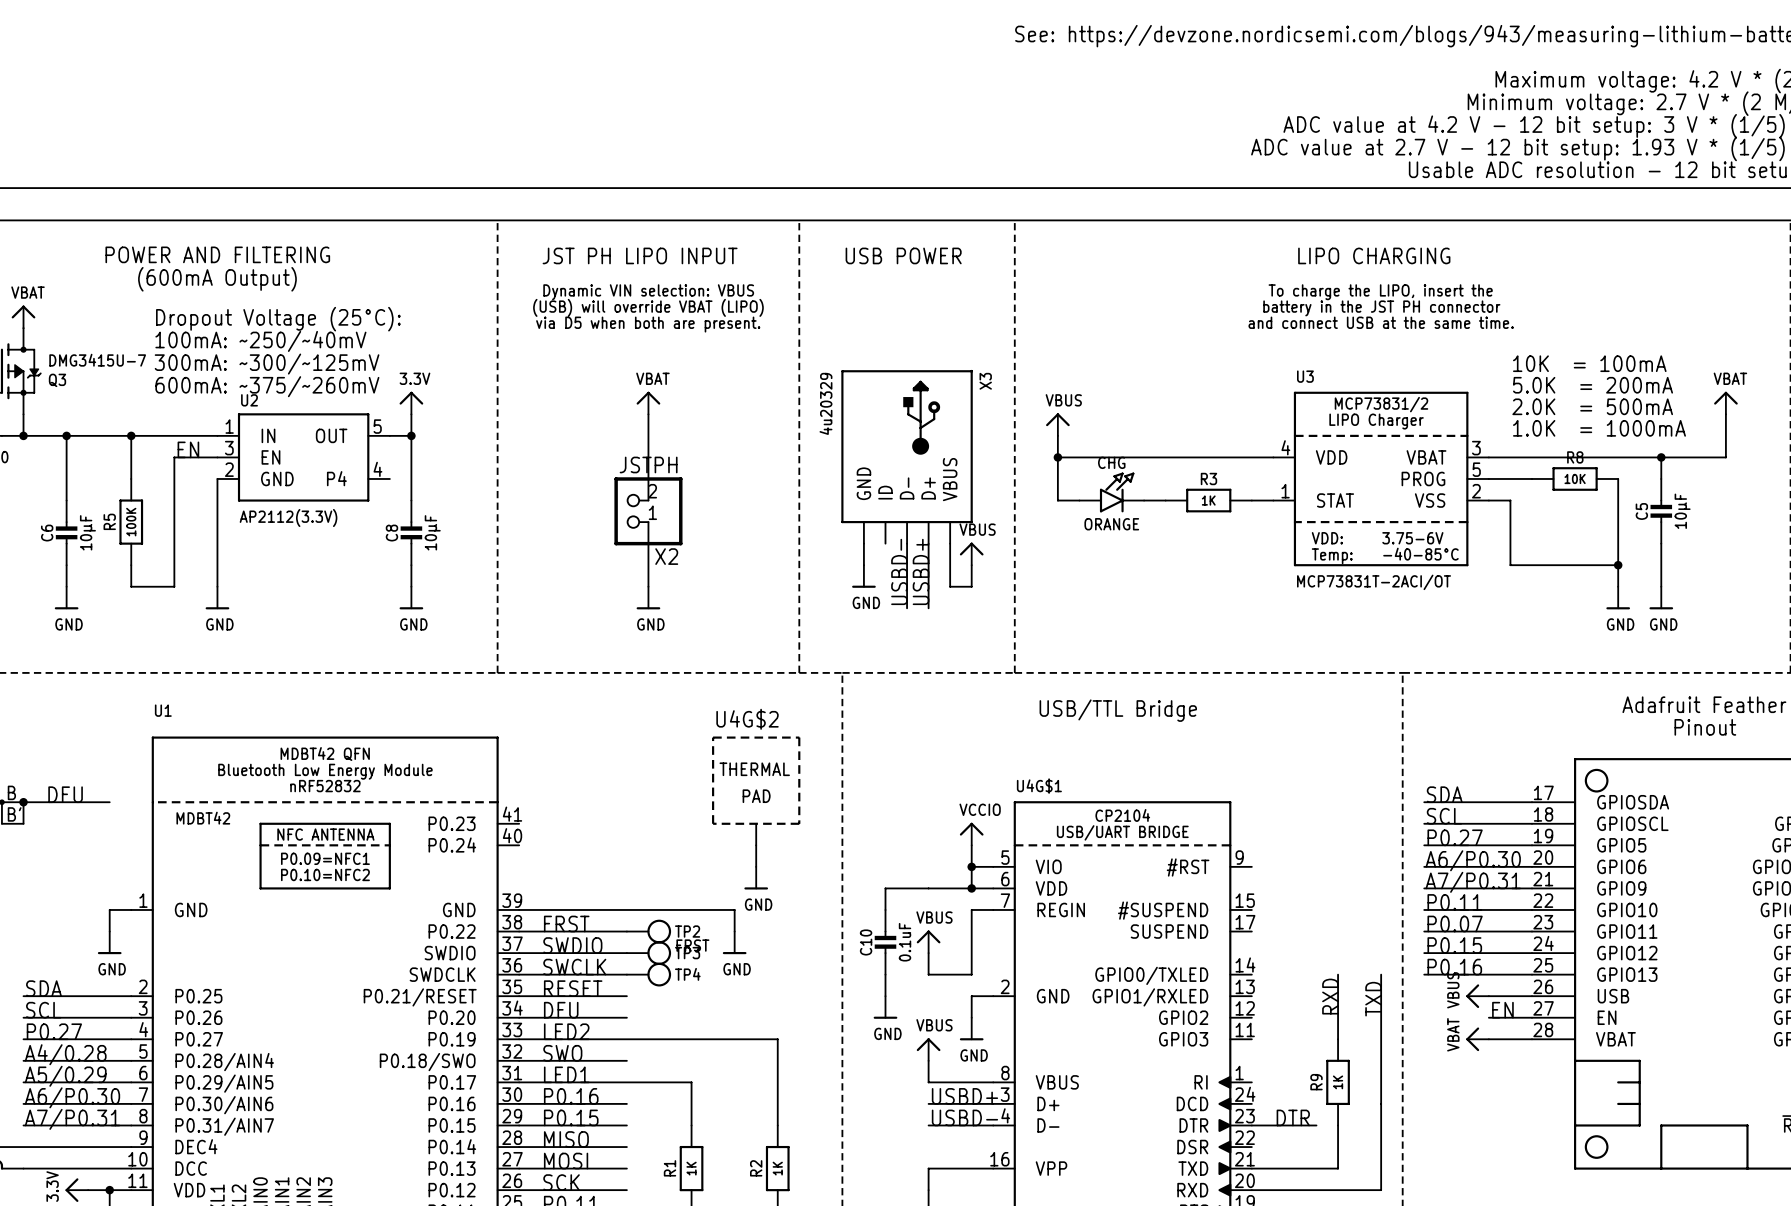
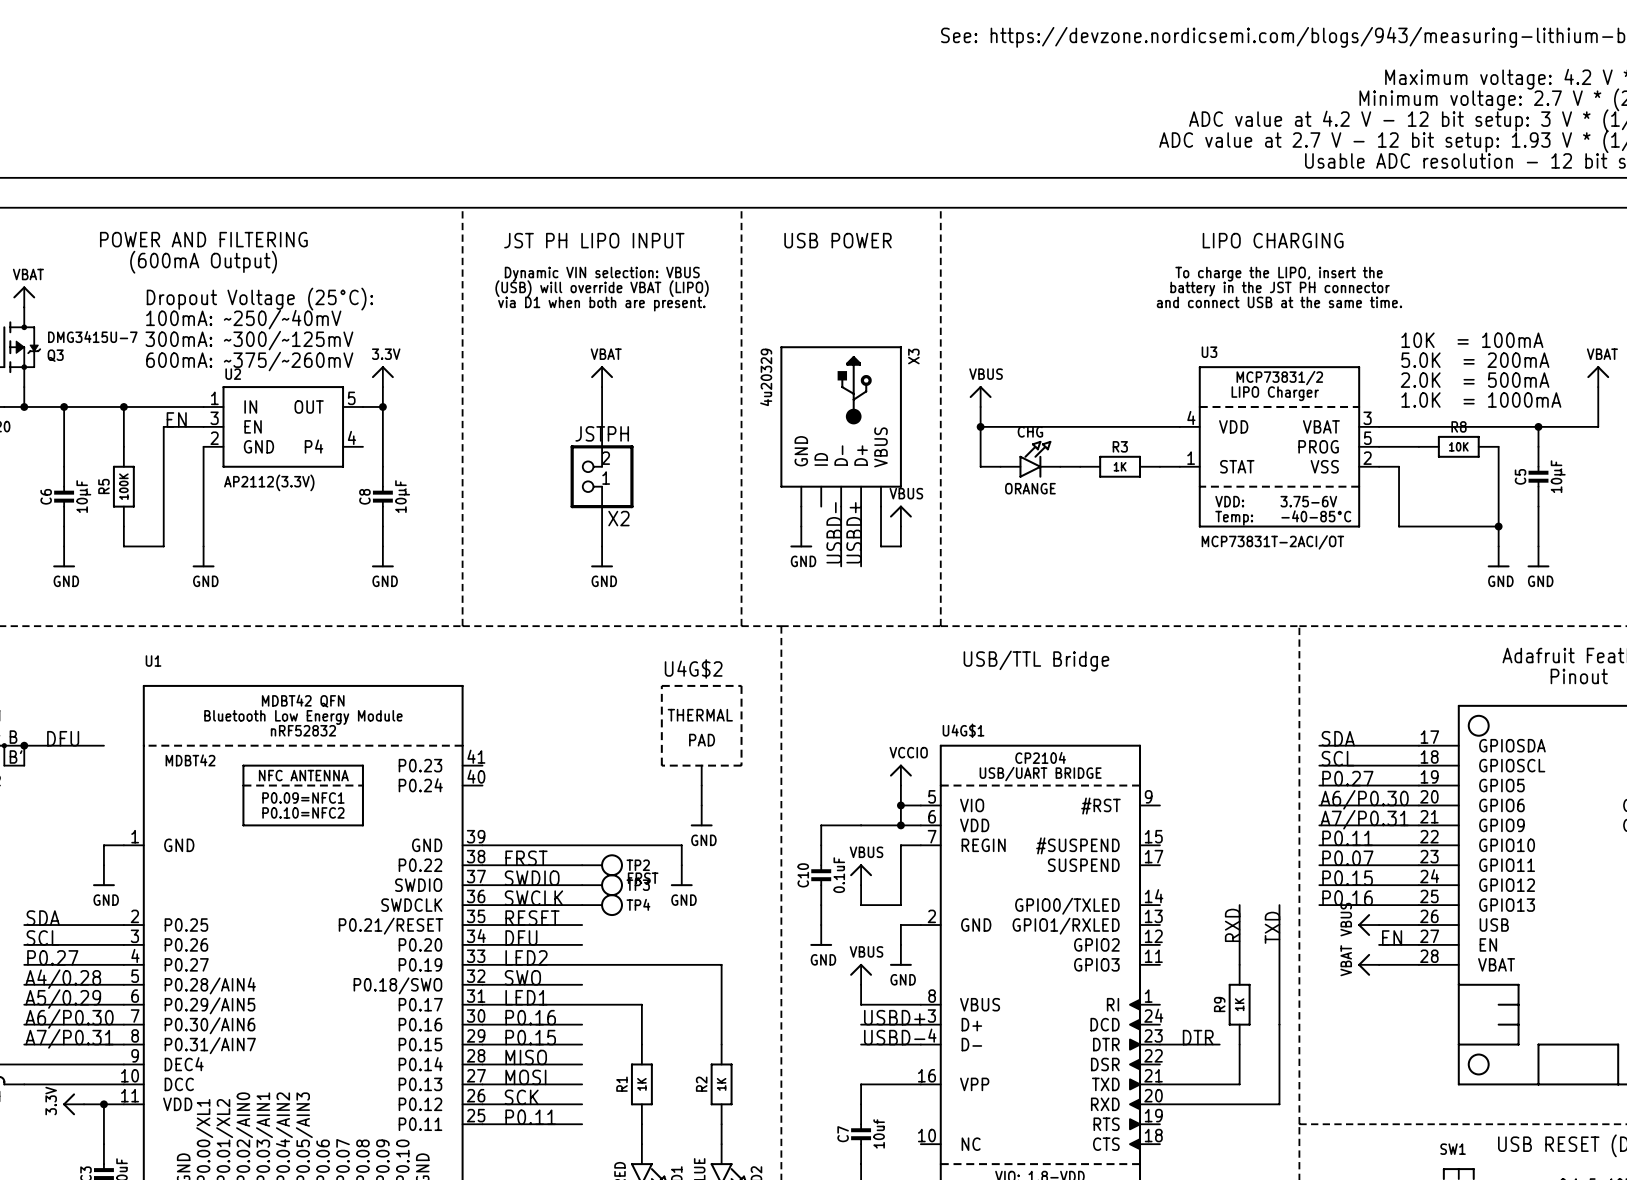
text: via D5 when both are present. (648, 324) -> via D1 when both are present. (601, 304)

